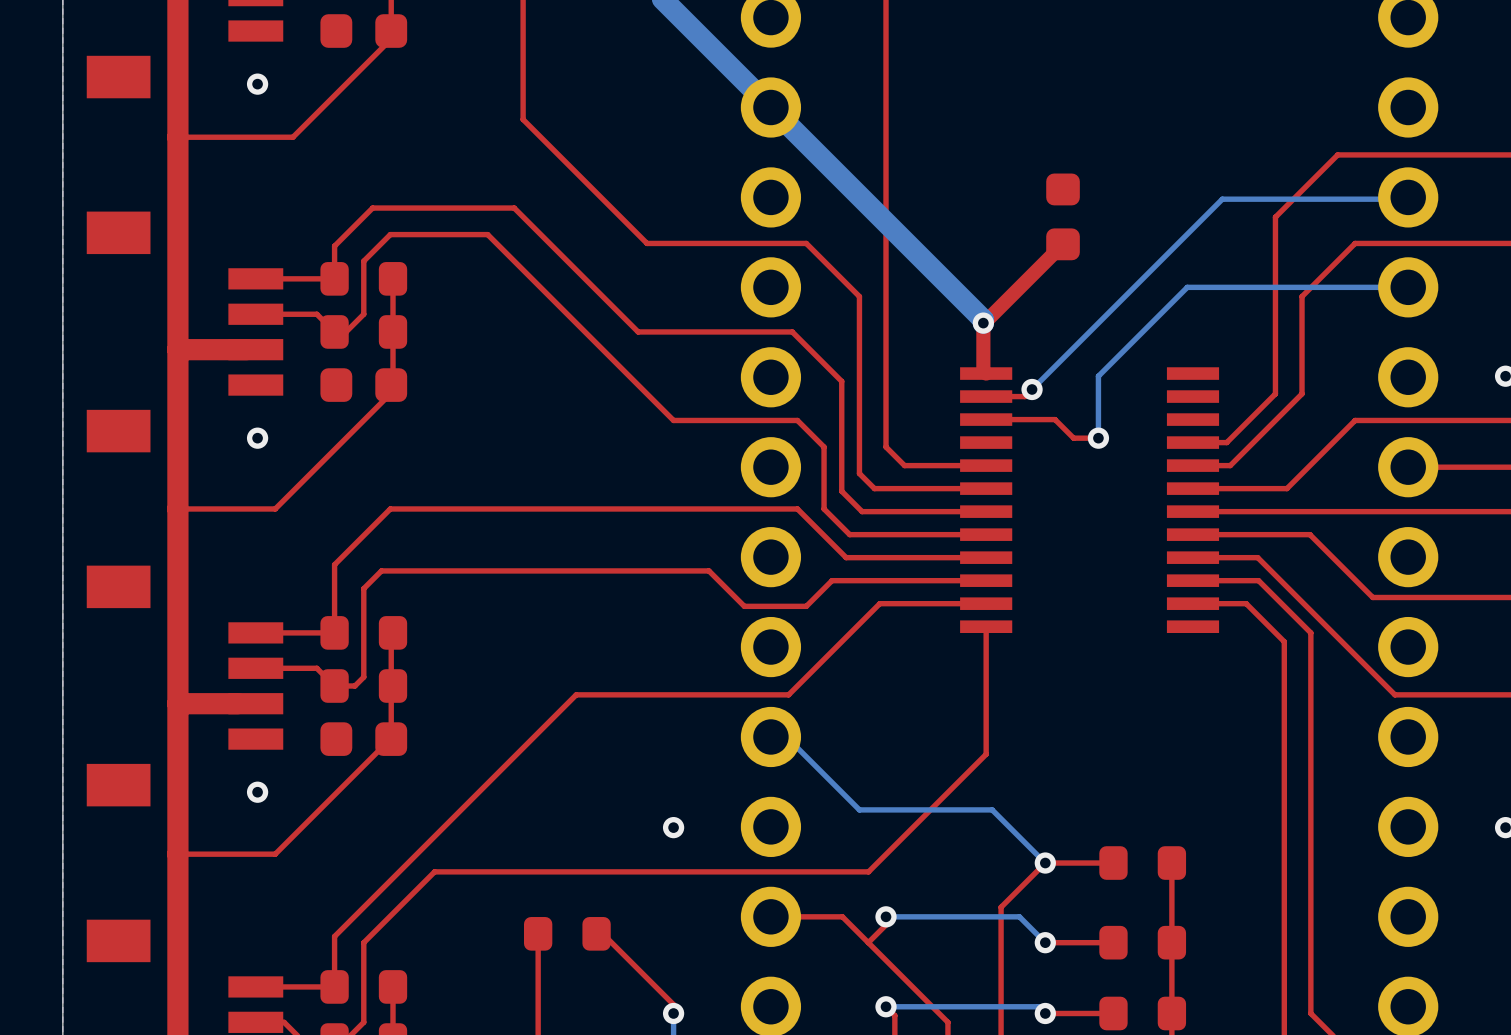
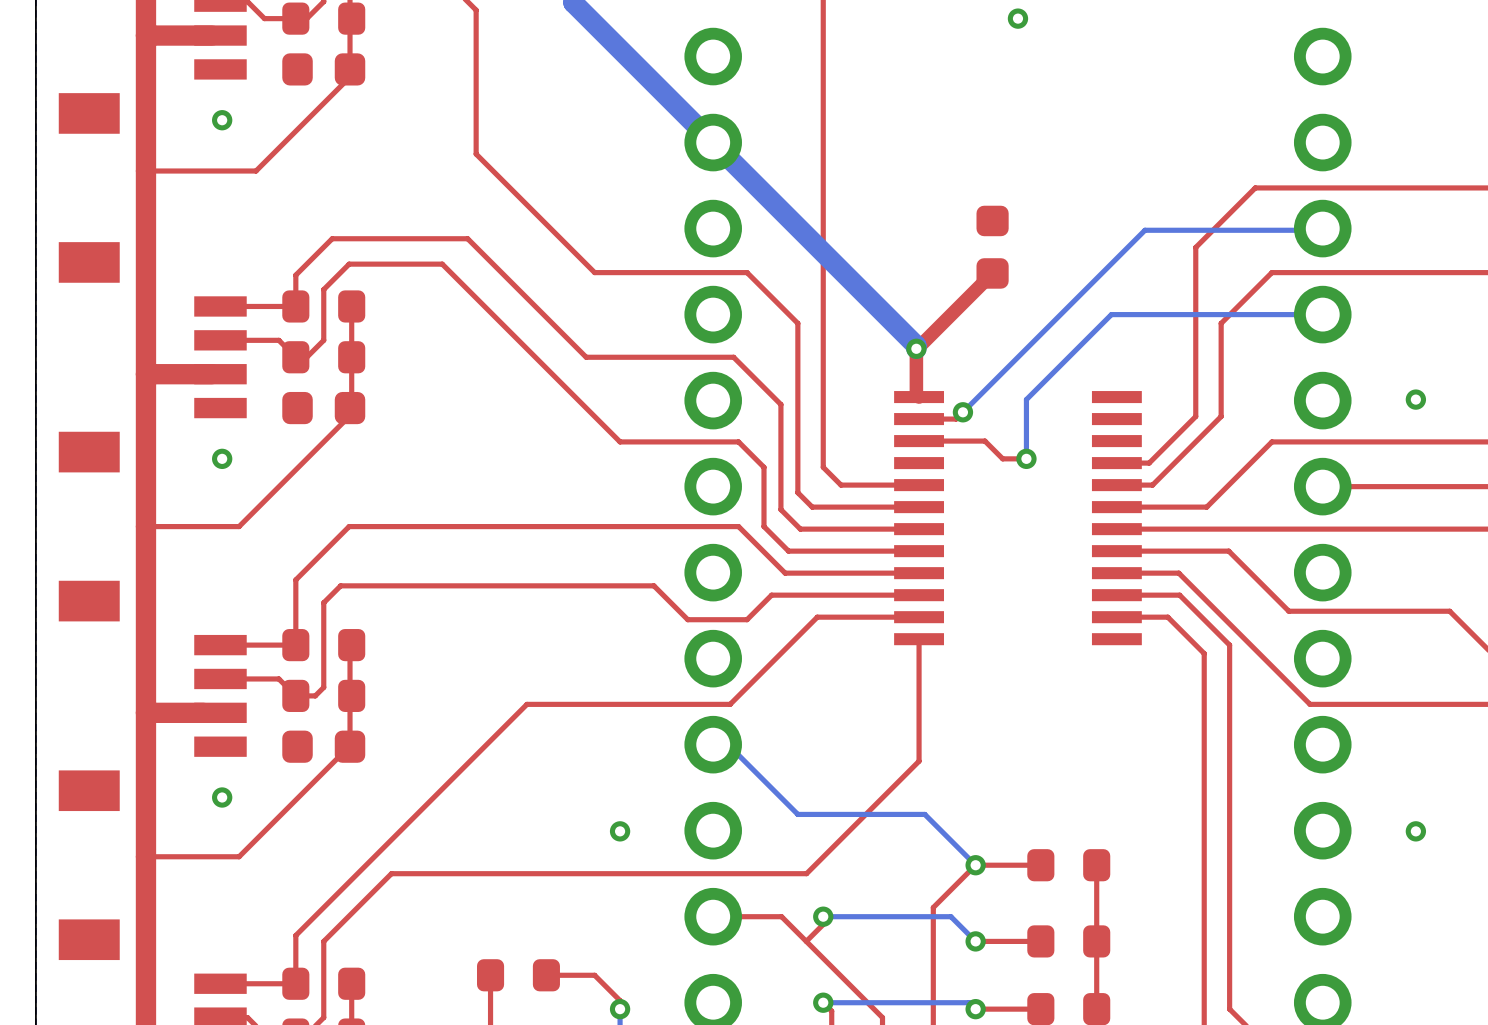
top track: (538, 933) (538, 978) -> none
part position: (567, 933) -> (518, 975)
top track: (596, 933) (602, 933) (647, 978) -> (546, 975) (594, 975)

